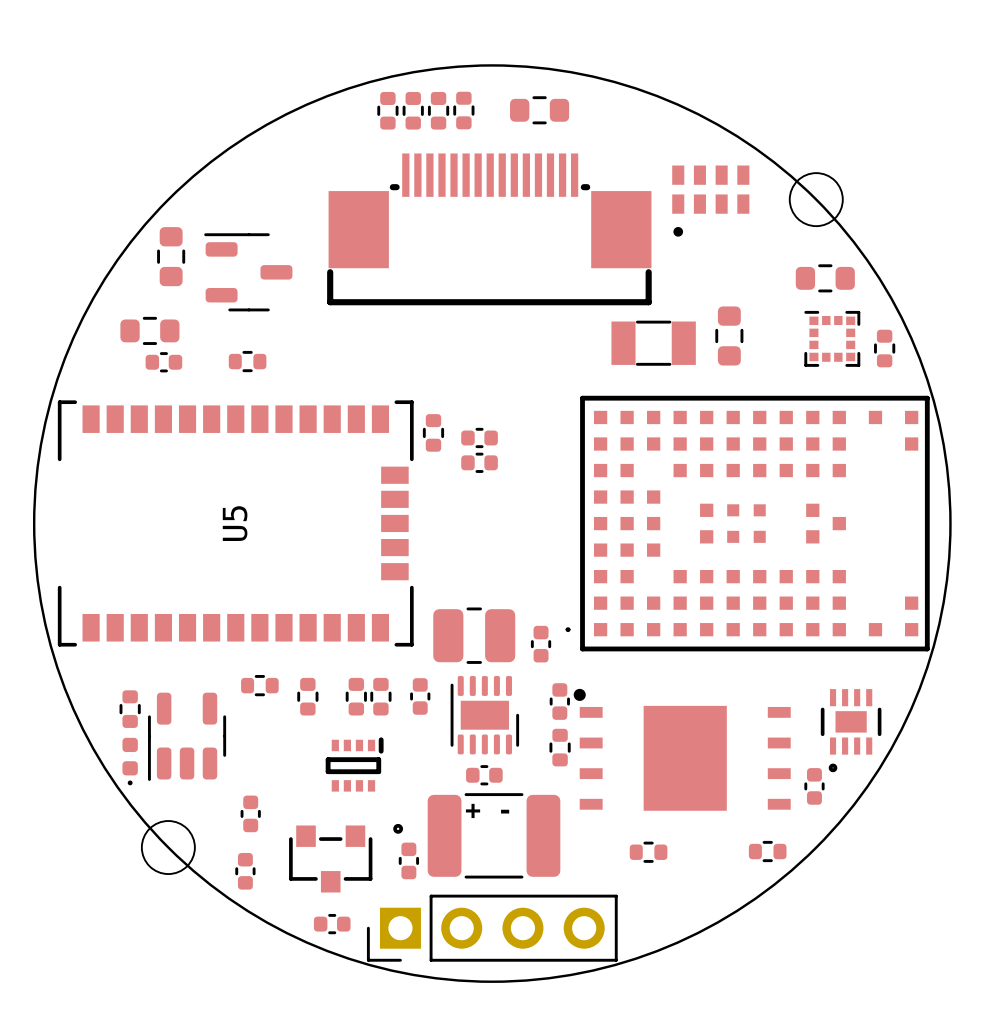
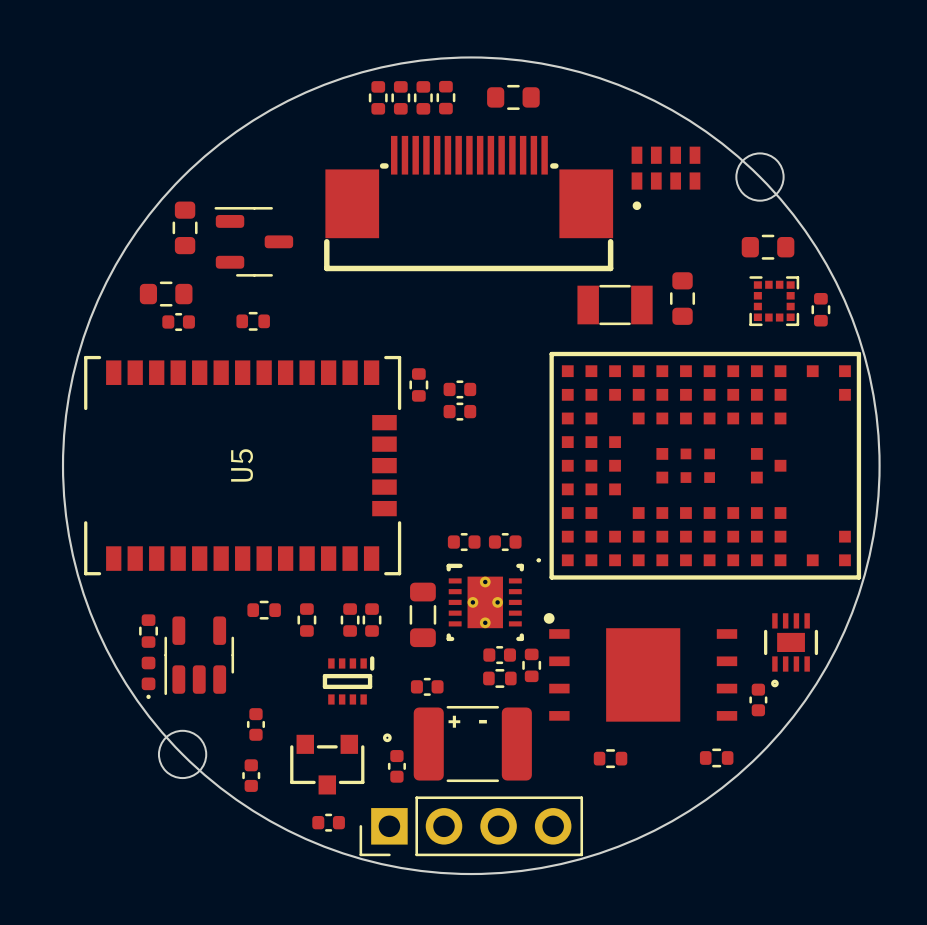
part: none -> (464, 542)
part: none -> (505, 542)
part: (474, 635) -> none
part: (541, 644) -> none
part: none -> (485, 602)
part footprint: [410, 678, 431, 715] -> [409, 582, 437, 648]
part: (559, 701) -> none
part: (484, 715) -> none
part: none -> (499, 655)
part: none -> (499, 678)
part: none -> (427, 686)
part: (484, 775) -> none

